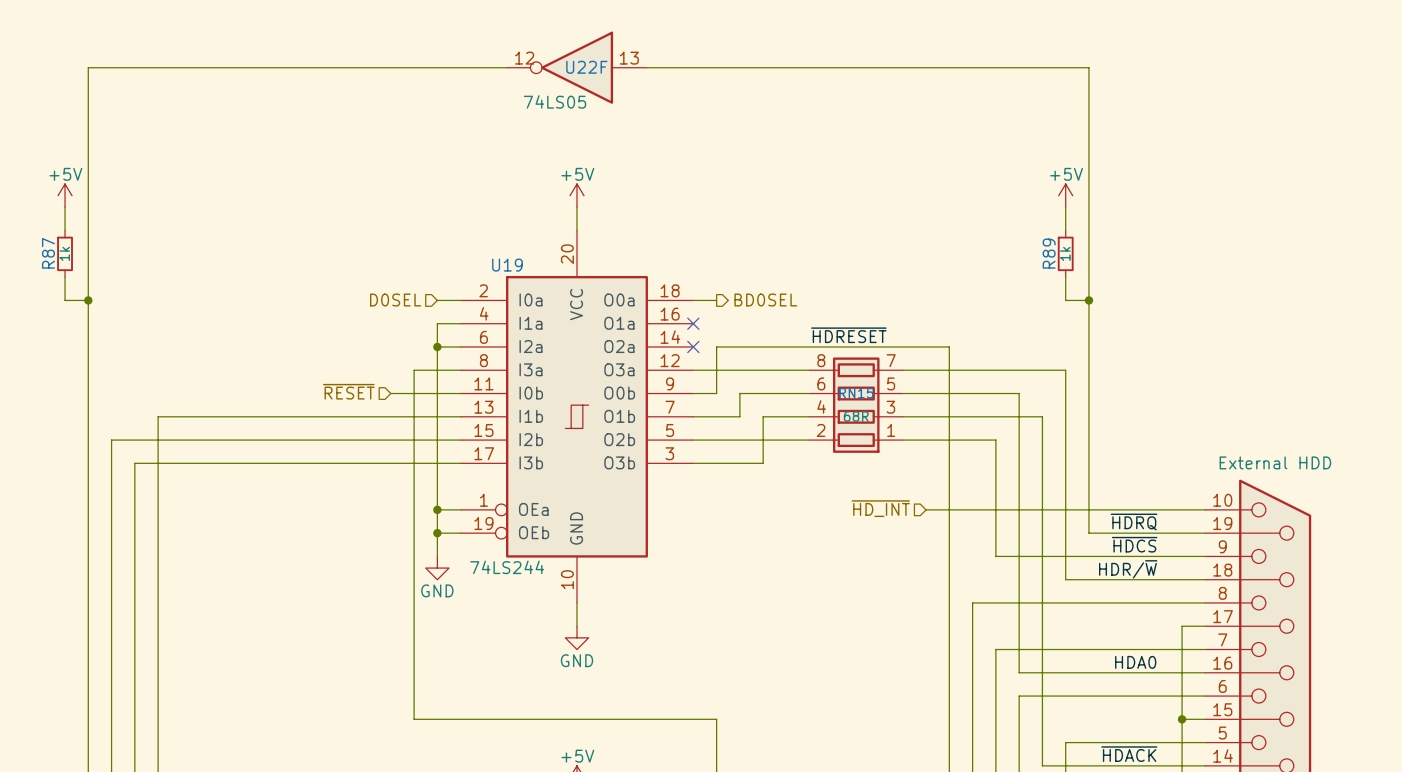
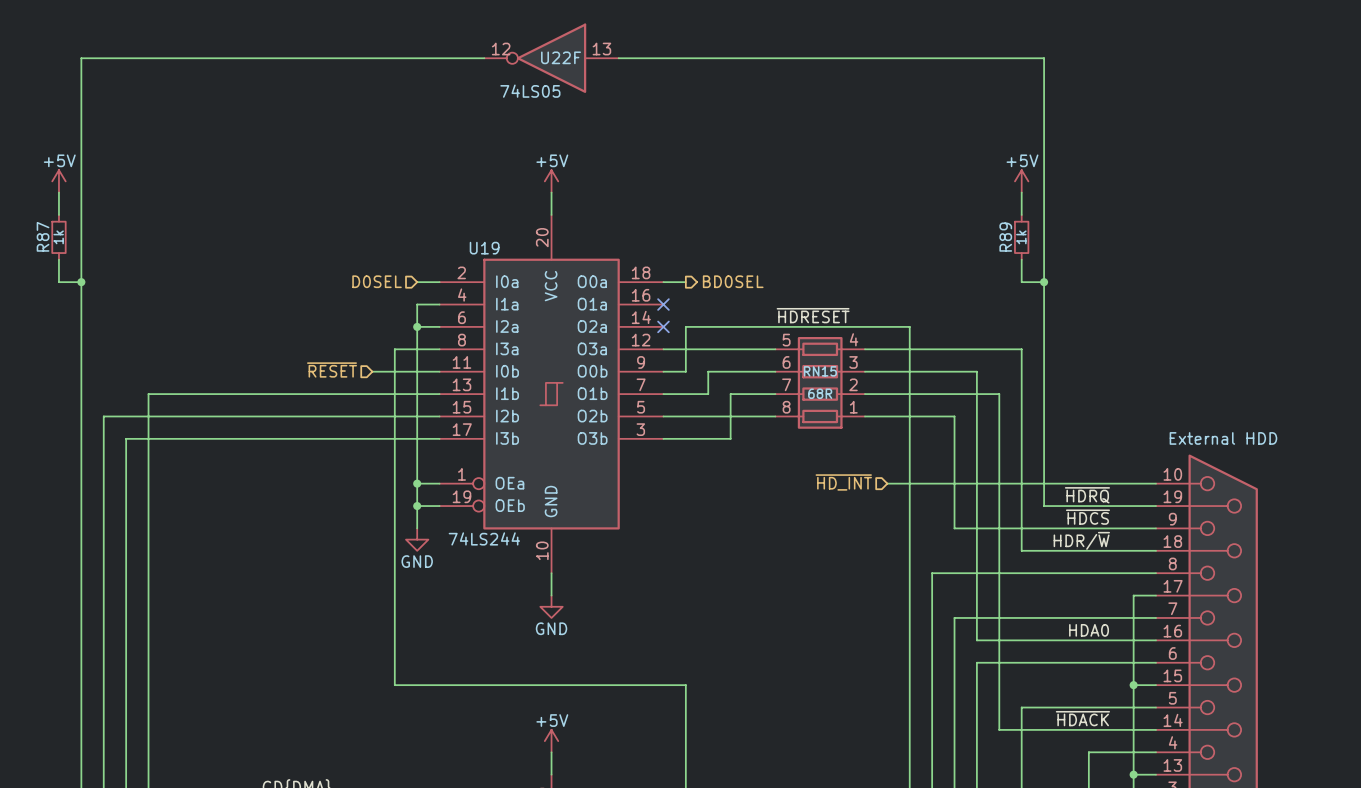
RN15 pin number: 8 (821, 360) -> 5 (786, 340)
RN15 pin number: 7 (891, 360) -> 4 (854, 339)
RN15 pin number: 5 (891, 383) -> 3 (853, 362)
RN15 pin number: 4 (821, 406) -> 7 (786, 384)
RN15 pin number: 3 (890, 407) -> 2 (853, 384)
RN15 pin number: 2 (821, 430) -> 8 (786, 407)

